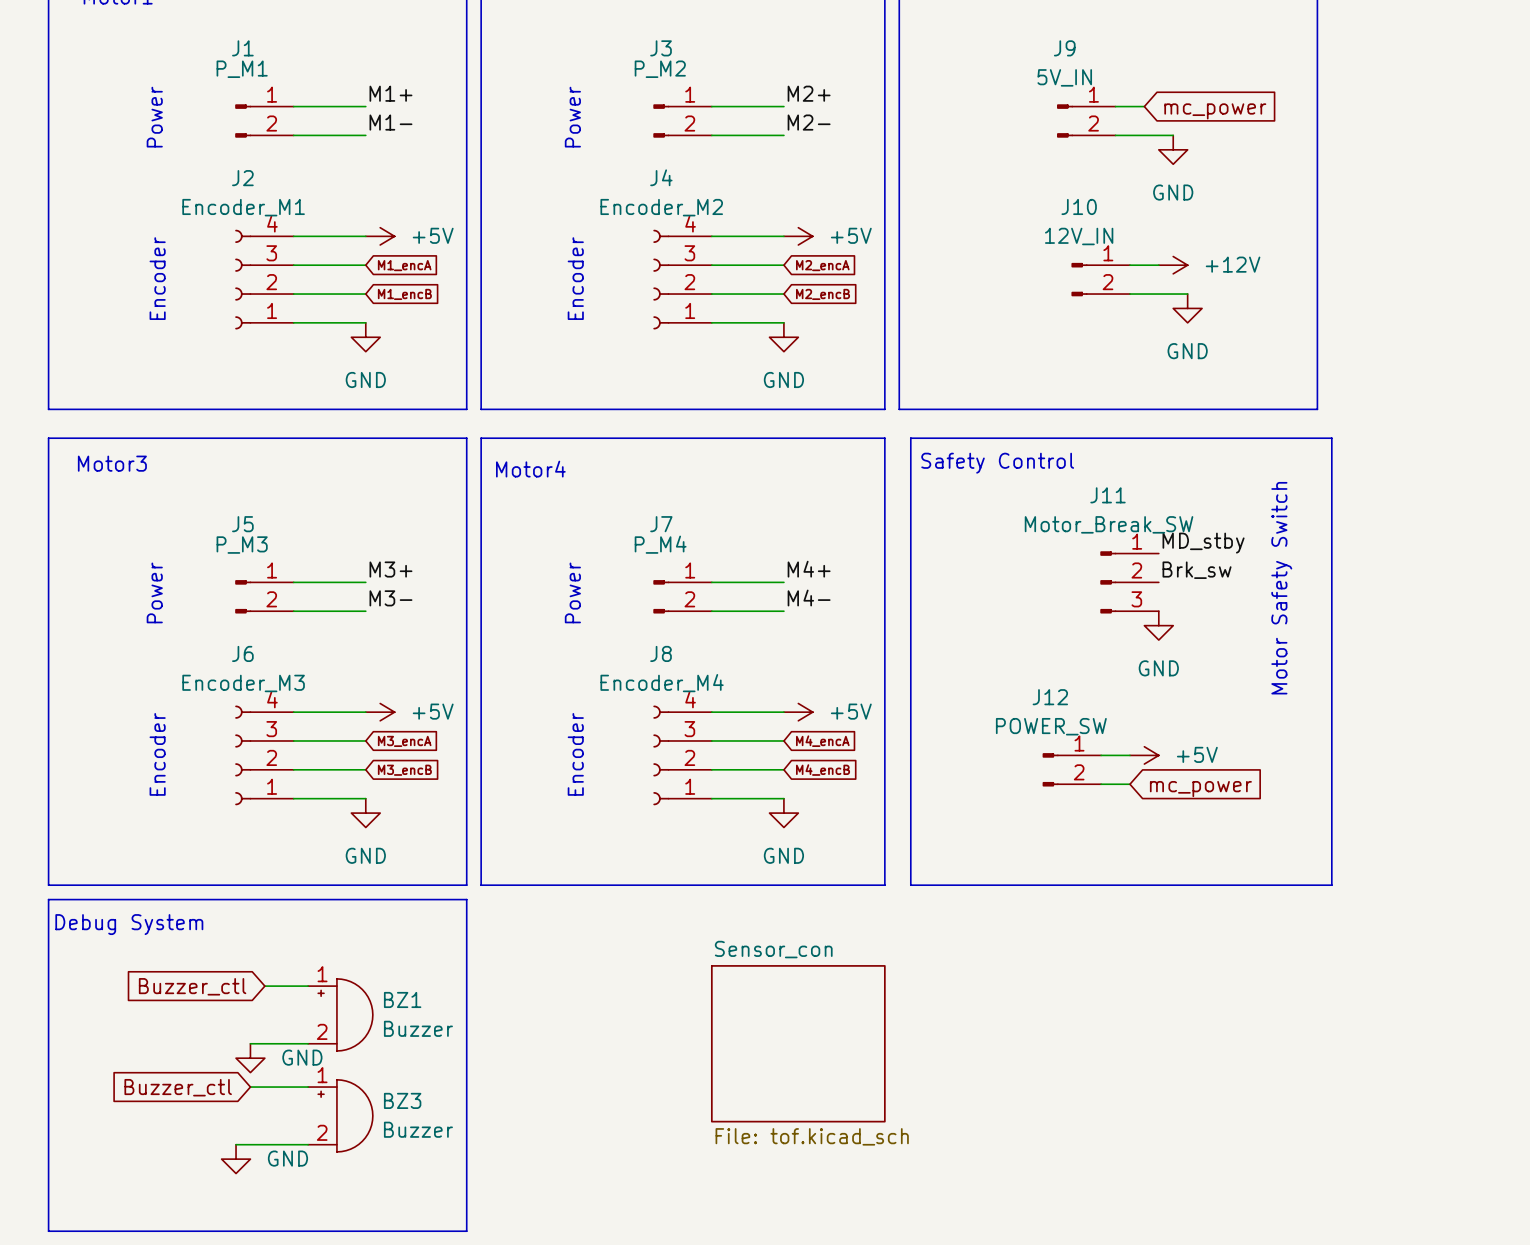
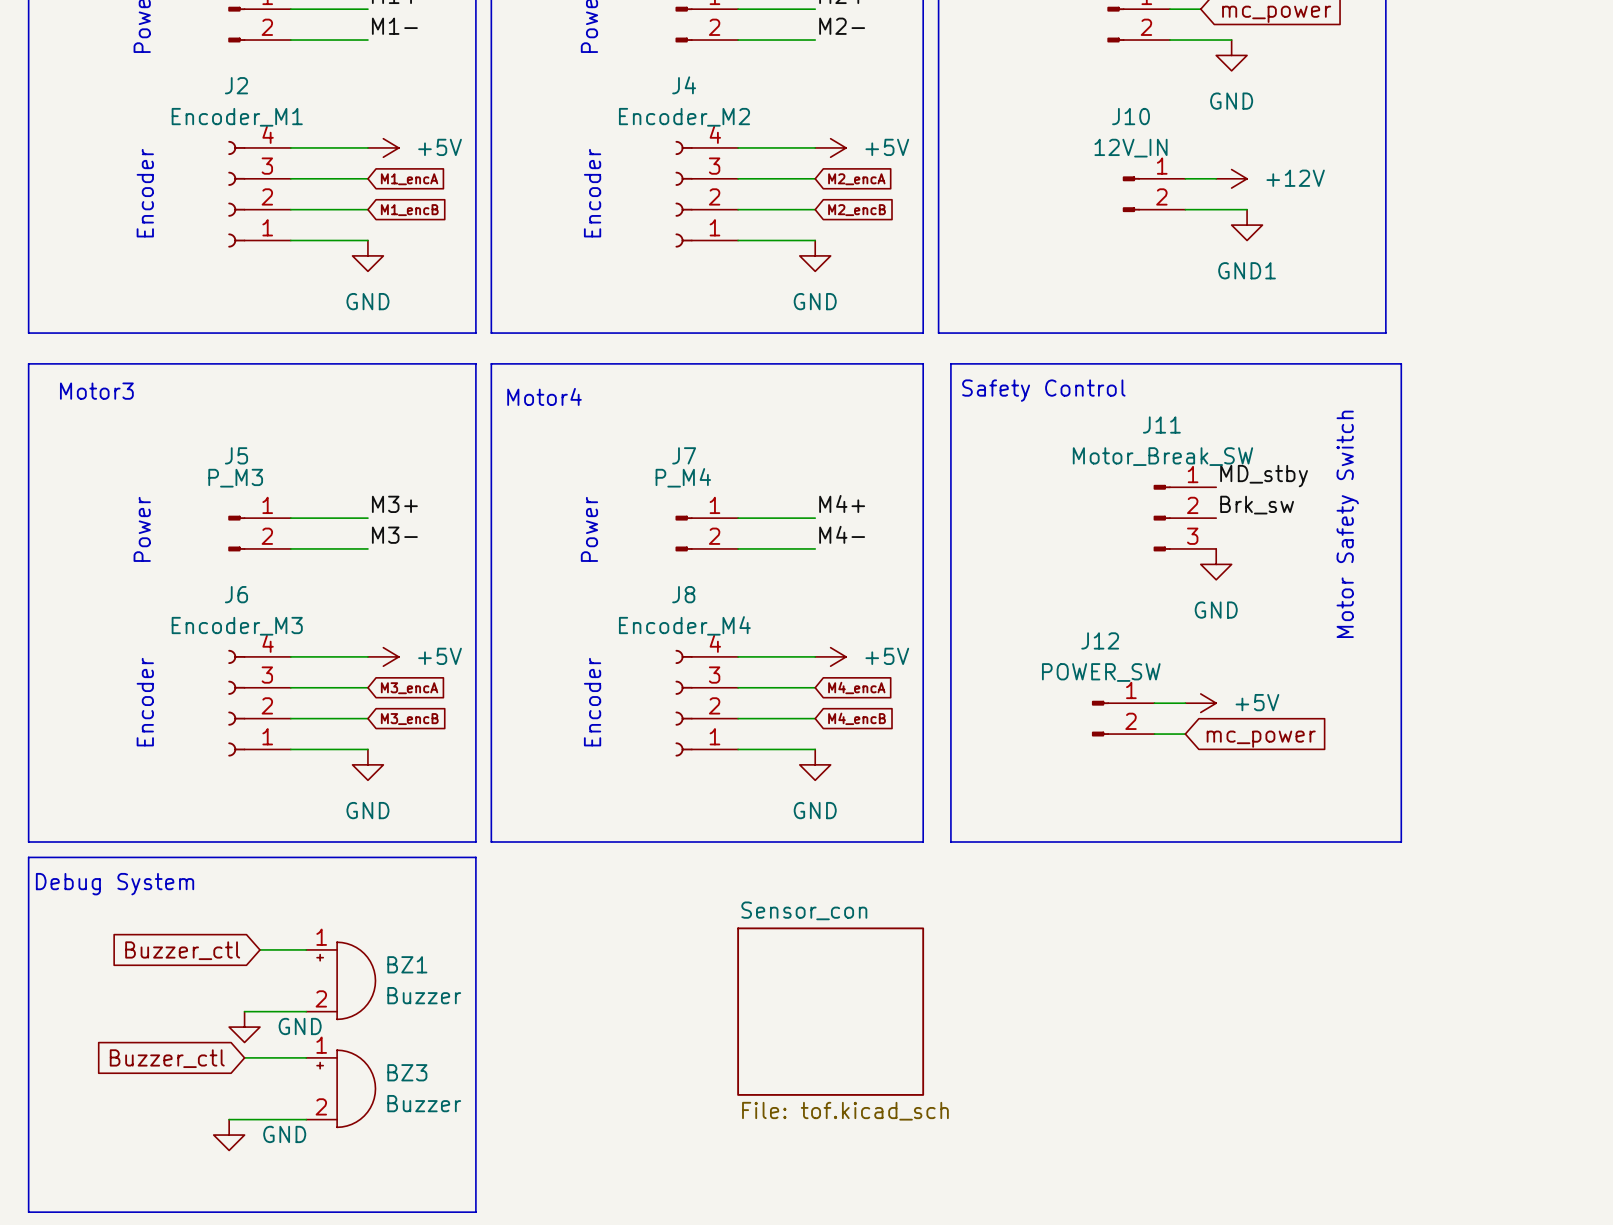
power symbol: GND (1187, 308) -> GND1 (1247, 225)

